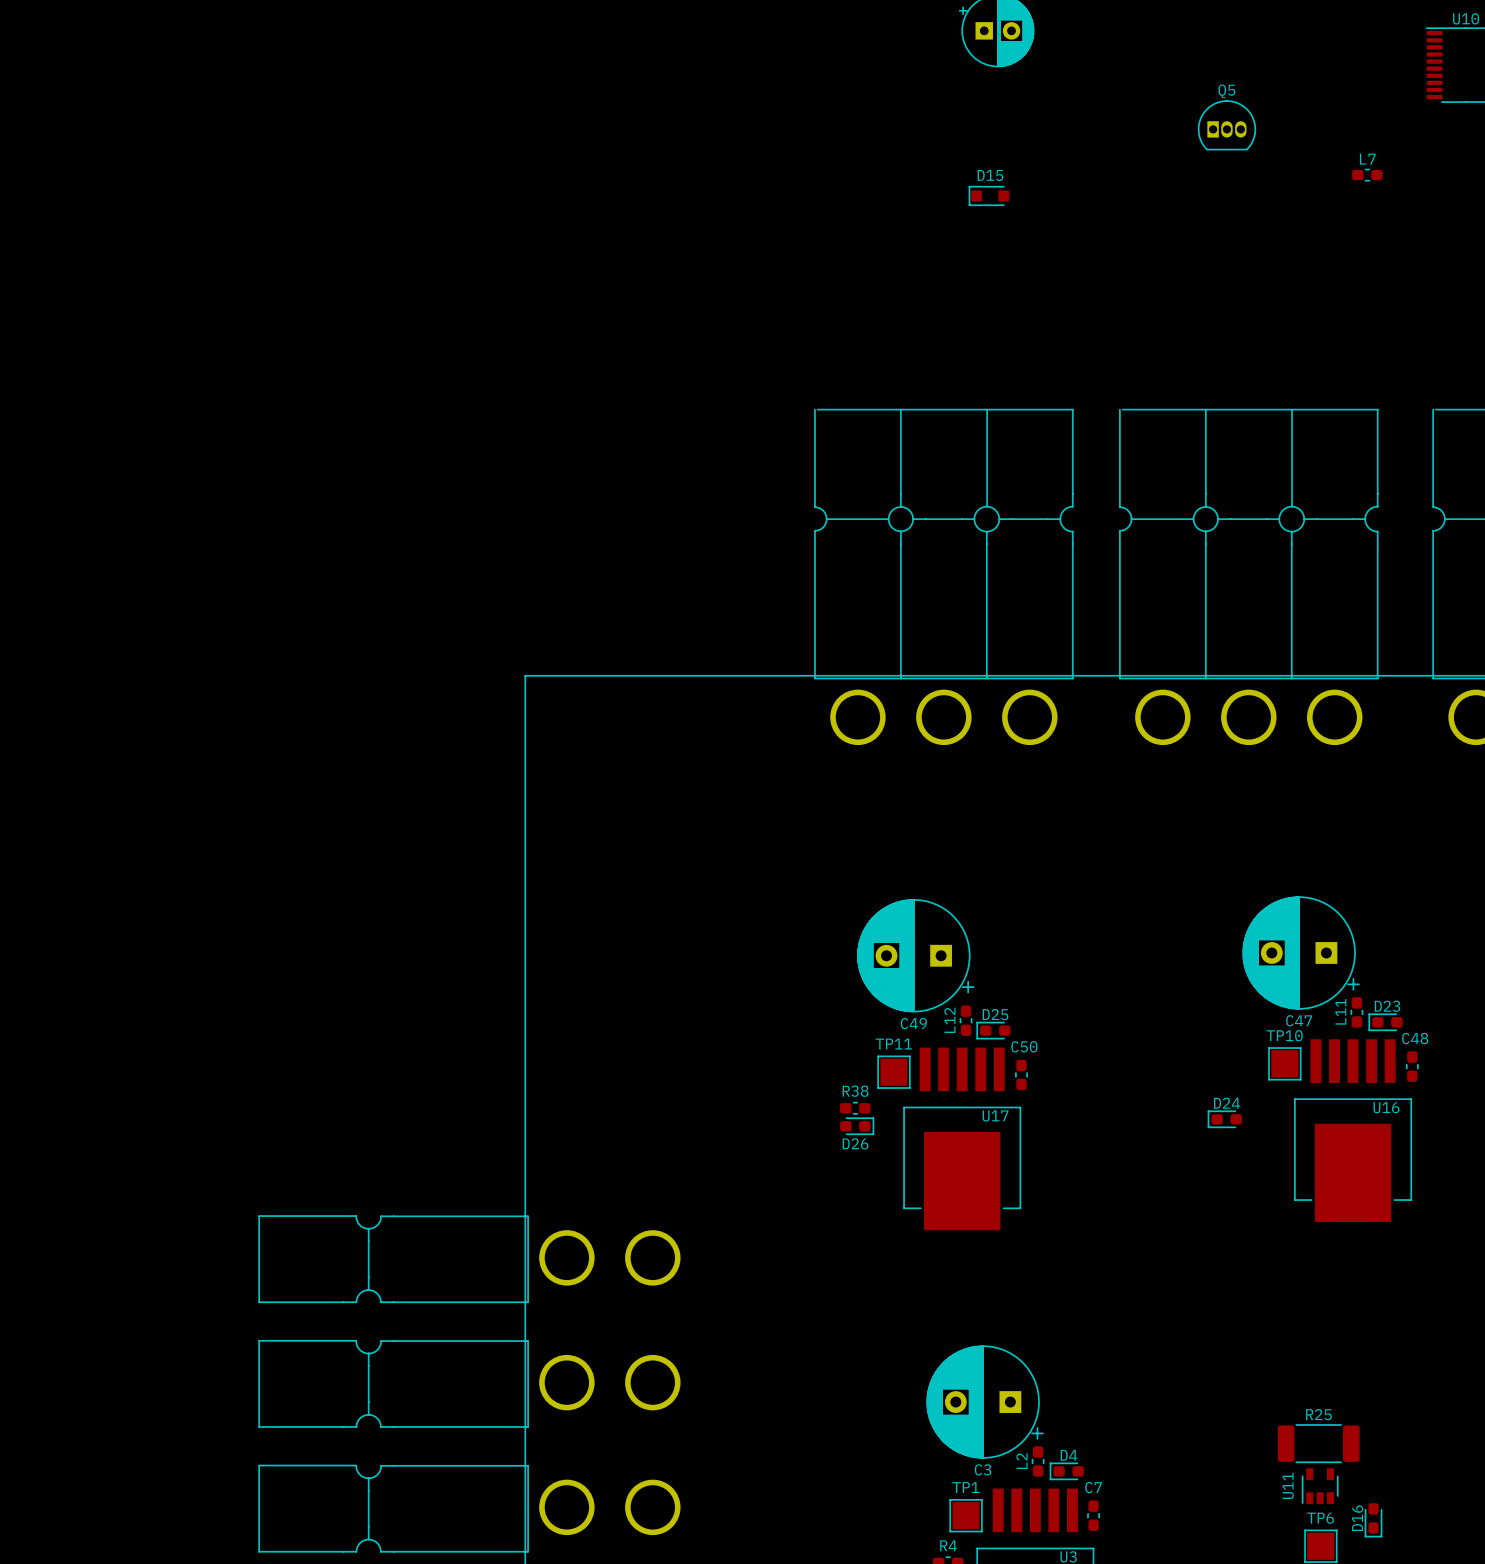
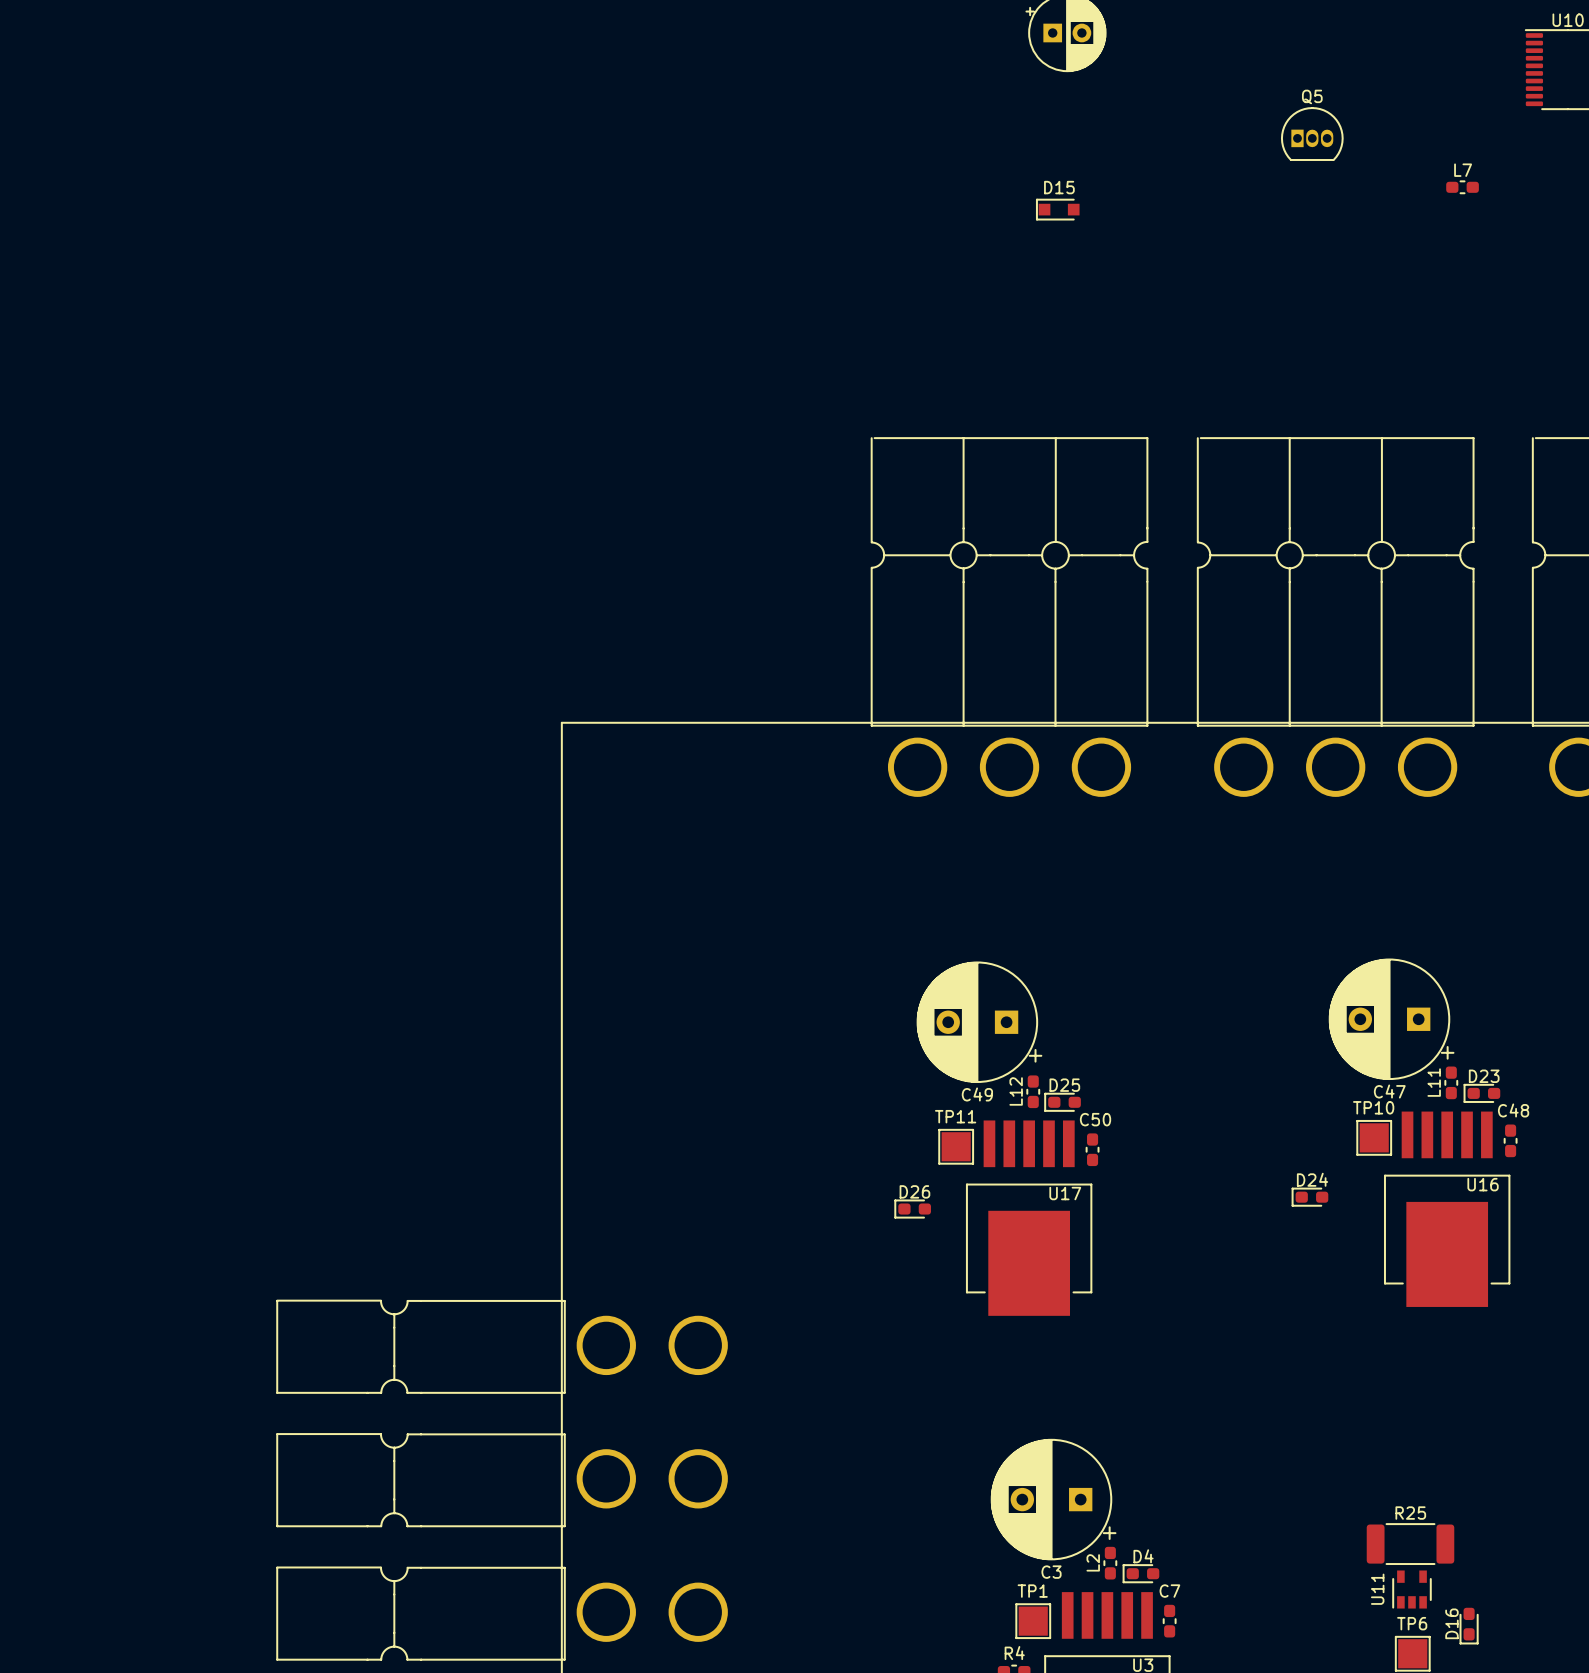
R38: (855, 1108) -> none
D26 rotation: 0° (857, 1126) -> 180° (912, 1209)

